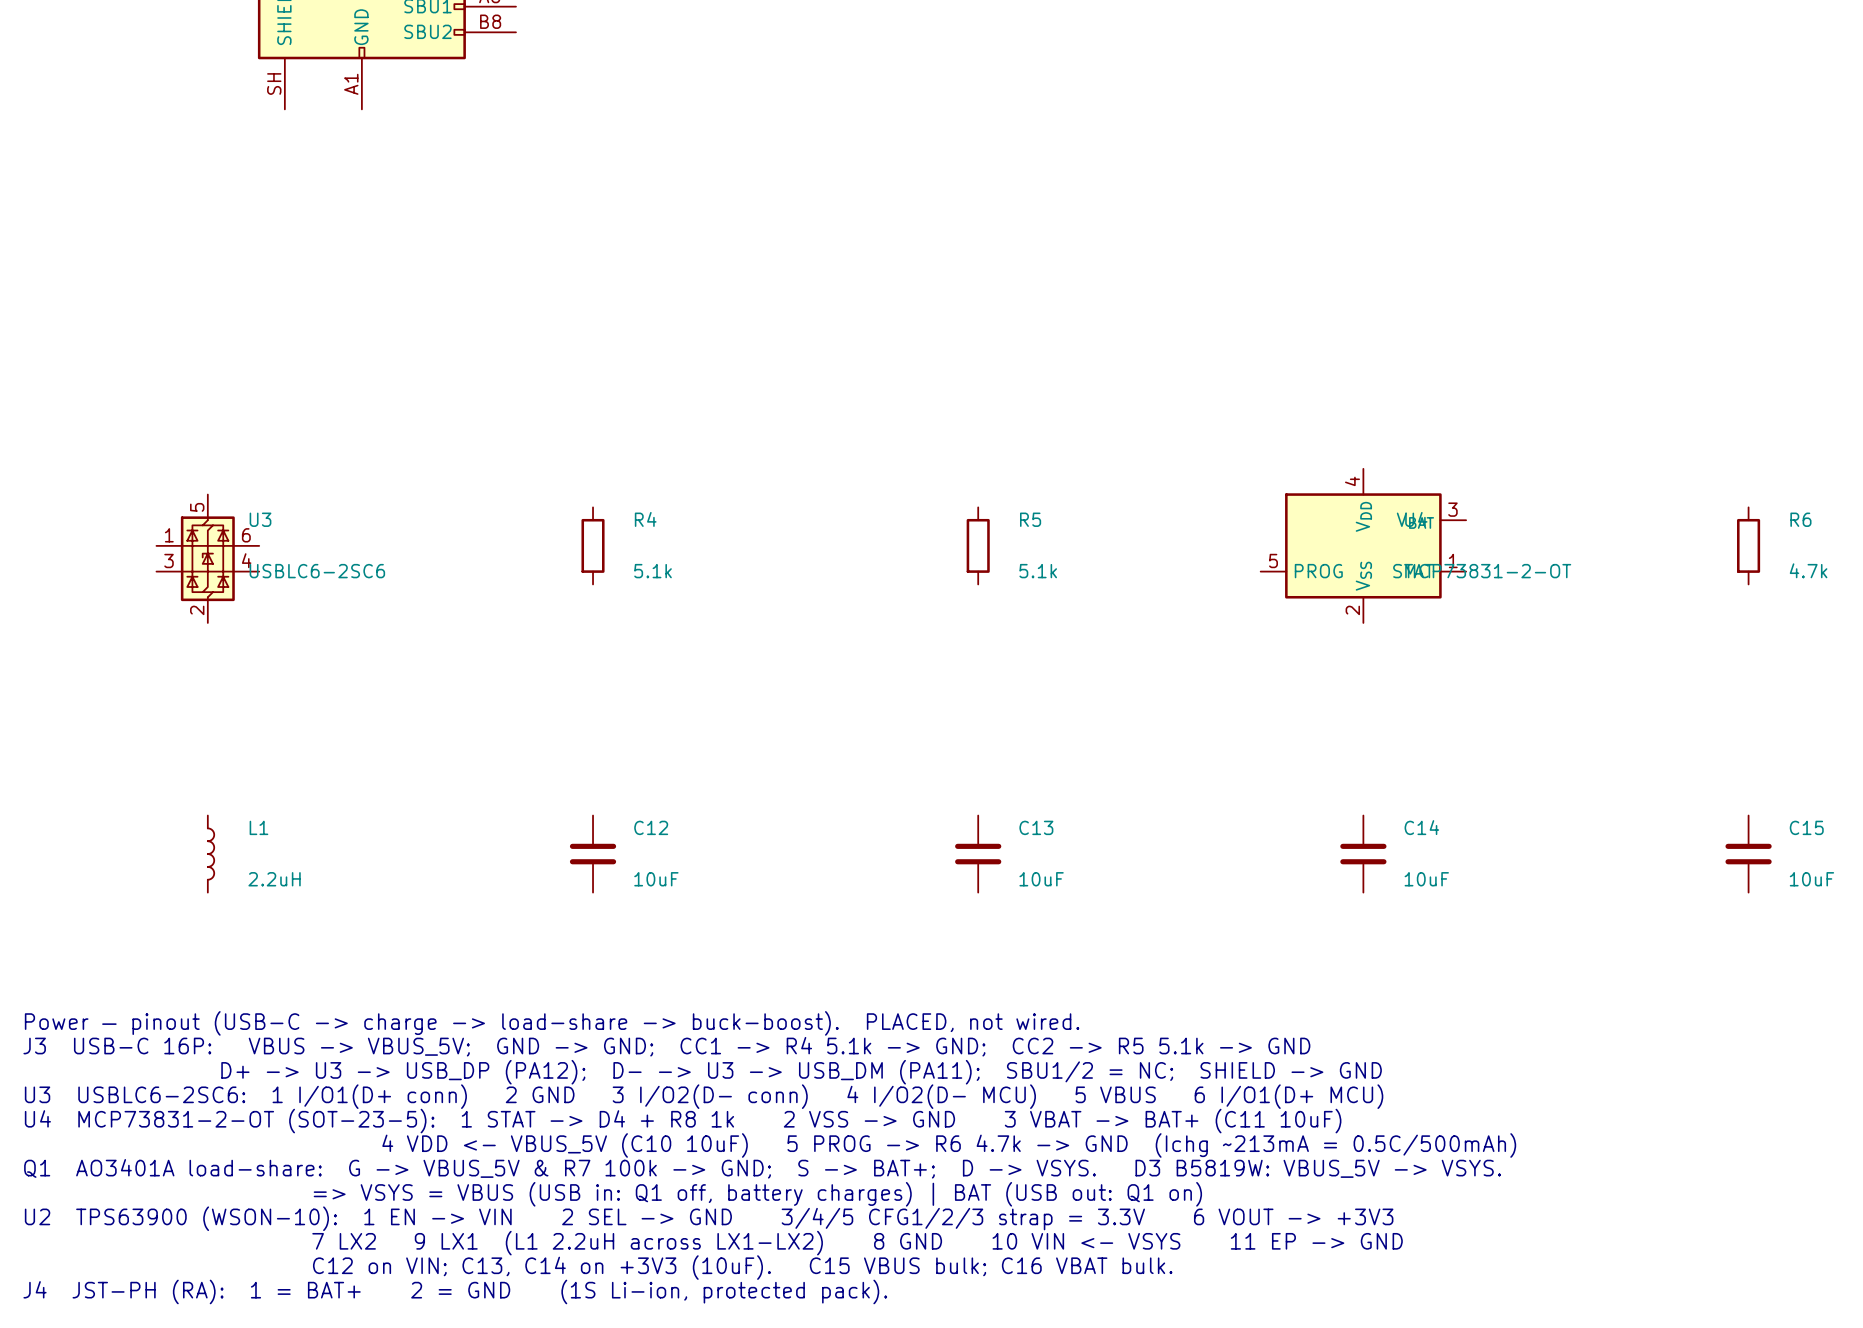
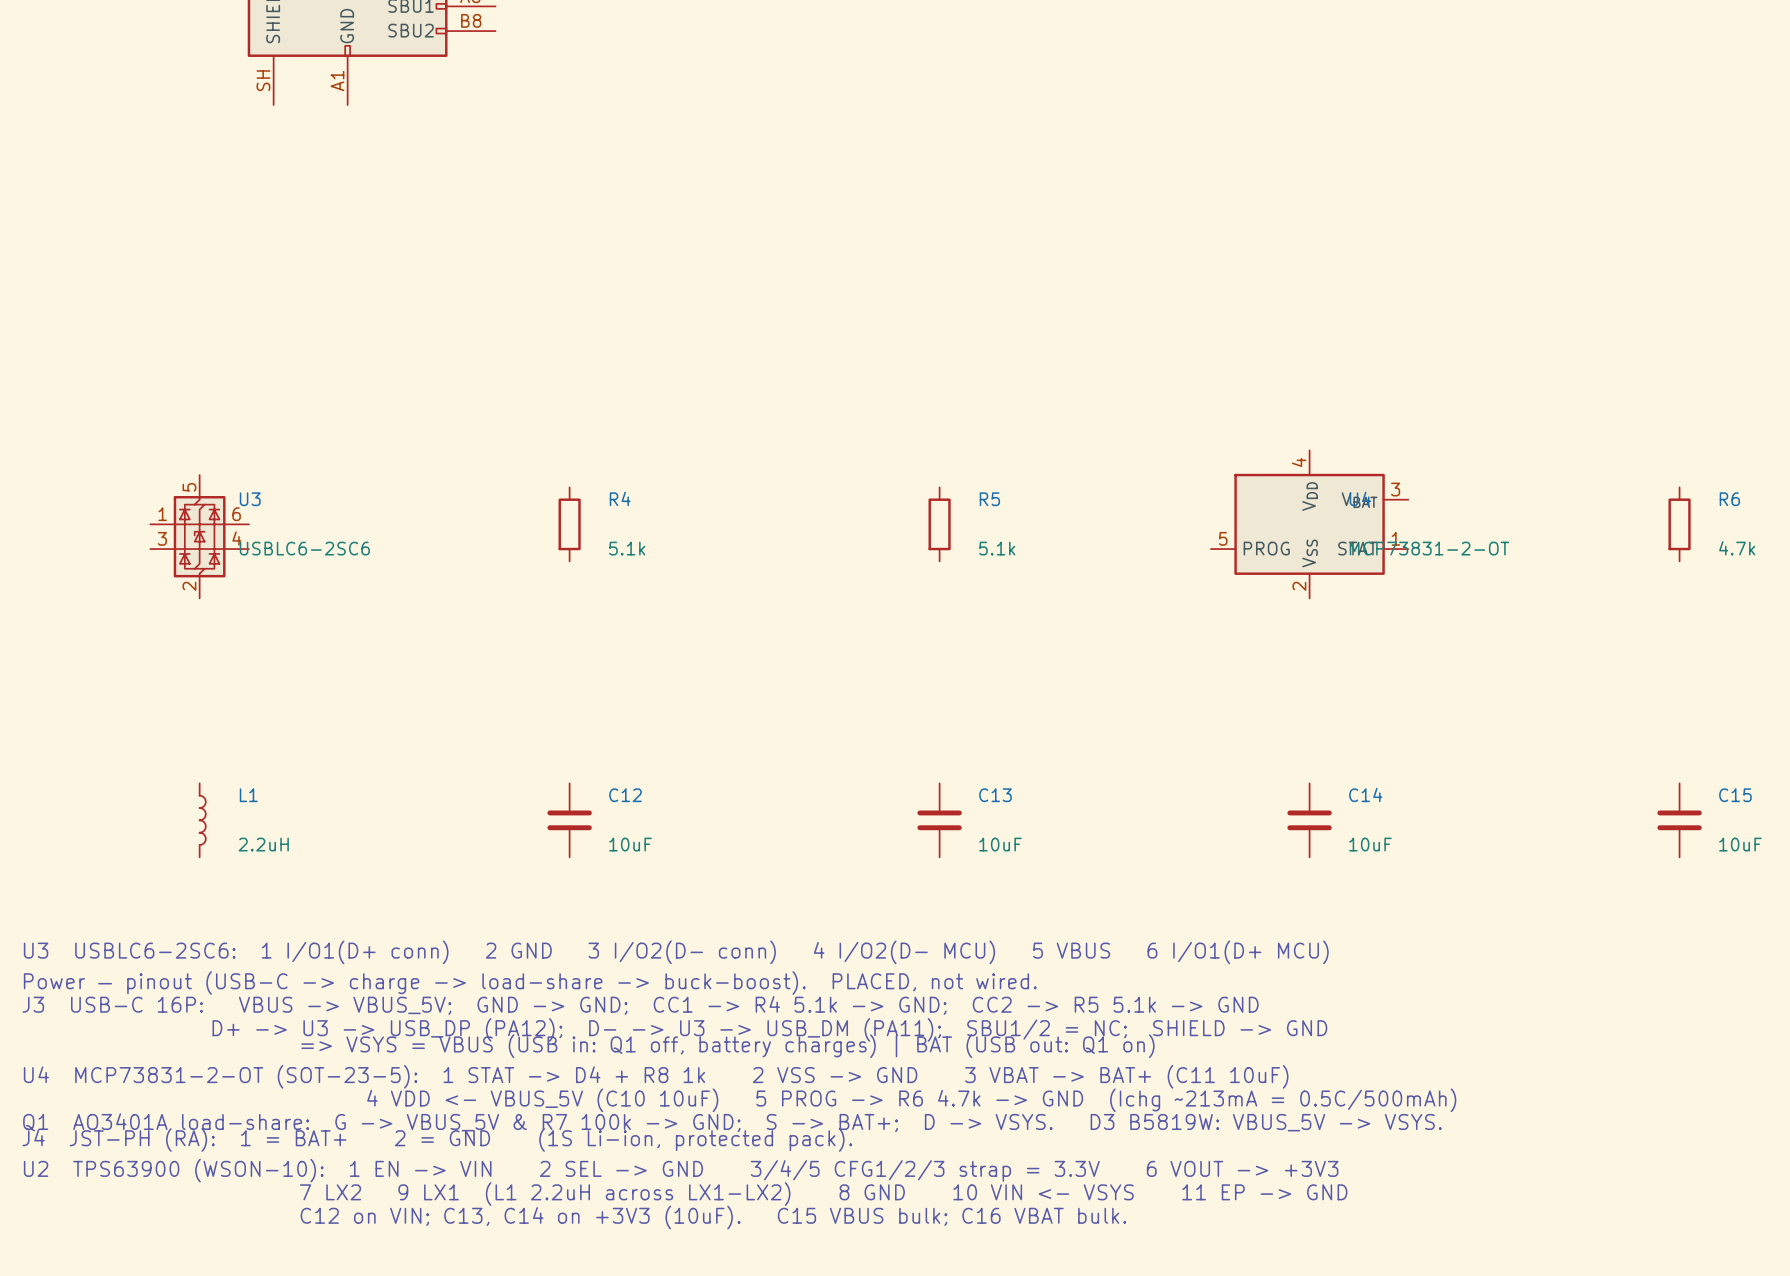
text position: U3 USBLC6-2SC6: 1 I/O1(D+ conn) 2 GND 3 I/O2(D- conn) 4 I/O2(D- MCU) 5 VBUS 6 I/O1(D+ MCU) (704, 1096) -> U3 USBLC6-2SC6: 1 I/O1(D+ conn) 2 GND 3 I/O2(D- conn) 4 I/O2(D- MCU) 5 VBUS 6 I/O1(D+ MCU) (676, 952)
text position: => VSYS = VBUS (USB in: Q1 off, battery charges) | BAT (USB out: Q1 on) (757, 1194) -> => VSYS = VBUS (USB in: Q1 off, battery charges) | BAT (USB out: Q1 on) (727, 1046)
text position: J4 JST-PH (RA): 1 = BAT+ 2 = GND (1S Li-ion, protected pack). (455, 1291) -> J4 JST-PH (RA): 1 = BAT+ 2 = GND (1S Li-ion, protected pack). (437, 1139)

